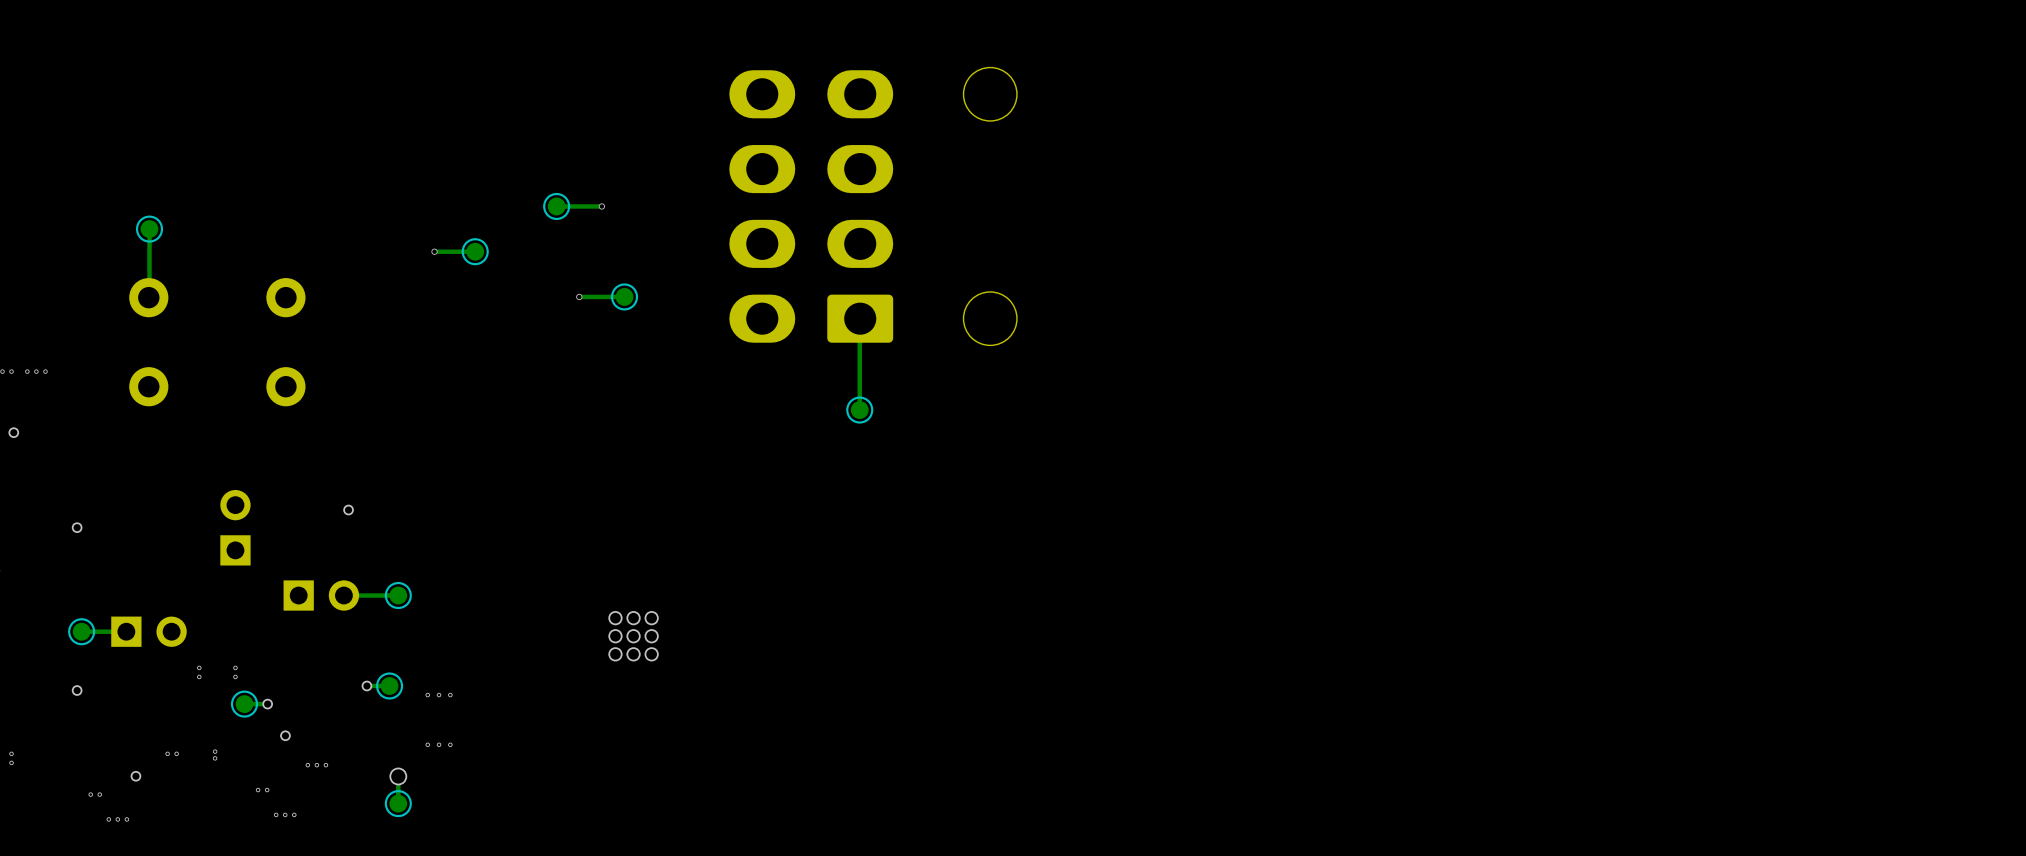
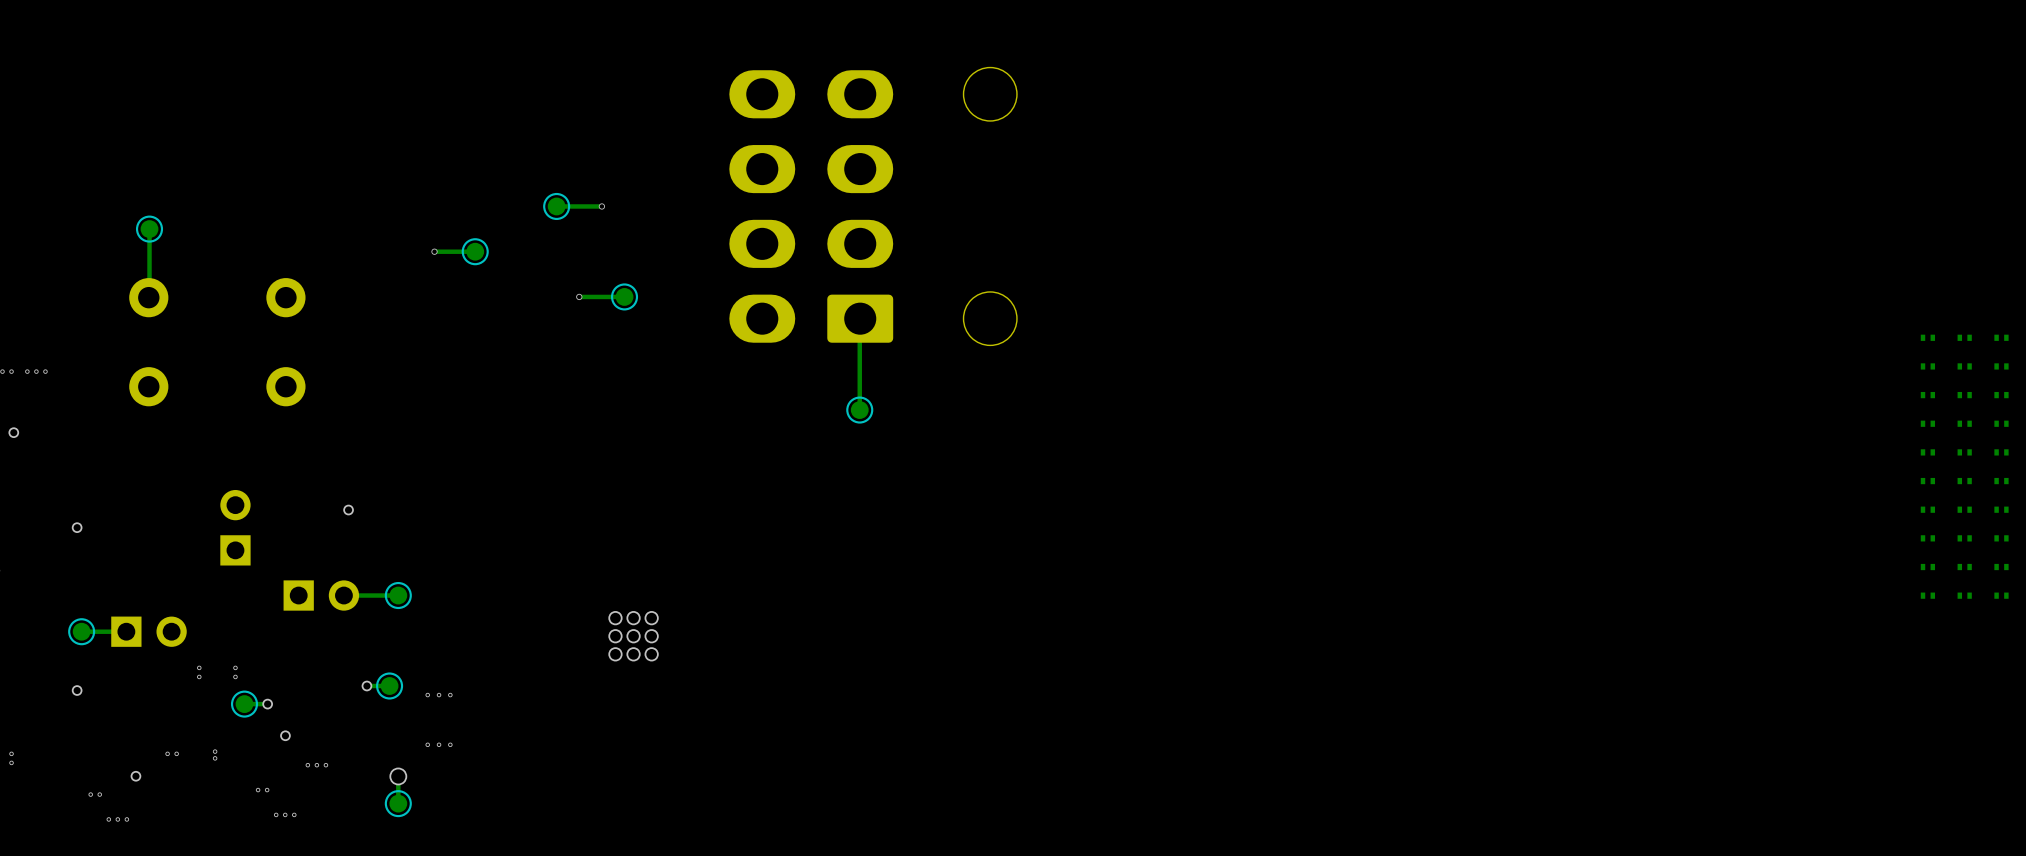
part: none -> (1927, 337)
part: none -> (1964, 337)
part: none -> (2001, 337)
part: none -> (1927, 366)
part: none -> (1964, 366)
part: none -> (2001, 366)
part: none -> (1927, 395)
part: none -> (1964, 395)
part: none -> (2001, 395)
part: none -> (1927, 423)
part: none -> (1964, 423)
part: none -> (2001, 423)
part: none -> (1927, 452)
part: none -> (1964, 452)
part: none -> (2001, 452)
part: none -> (1927, 481)
part: none -> (1964, 481)
part: none -> (2001, 481)
part: none -> (1927, 509)
part: none -> (1964, 509)
part: none -> (2001, 509)
part: none -> (1927, 538)
part: none -> (1964, 538)
part: none -> (2001, 538)
part: none -> (1927, 567)
part: none -> (1964, 567)
part: none -> (2001, 567)
part: none -> (1927, 595)
part: none -> (1964, 595)
part: none -> (2001, 595)

